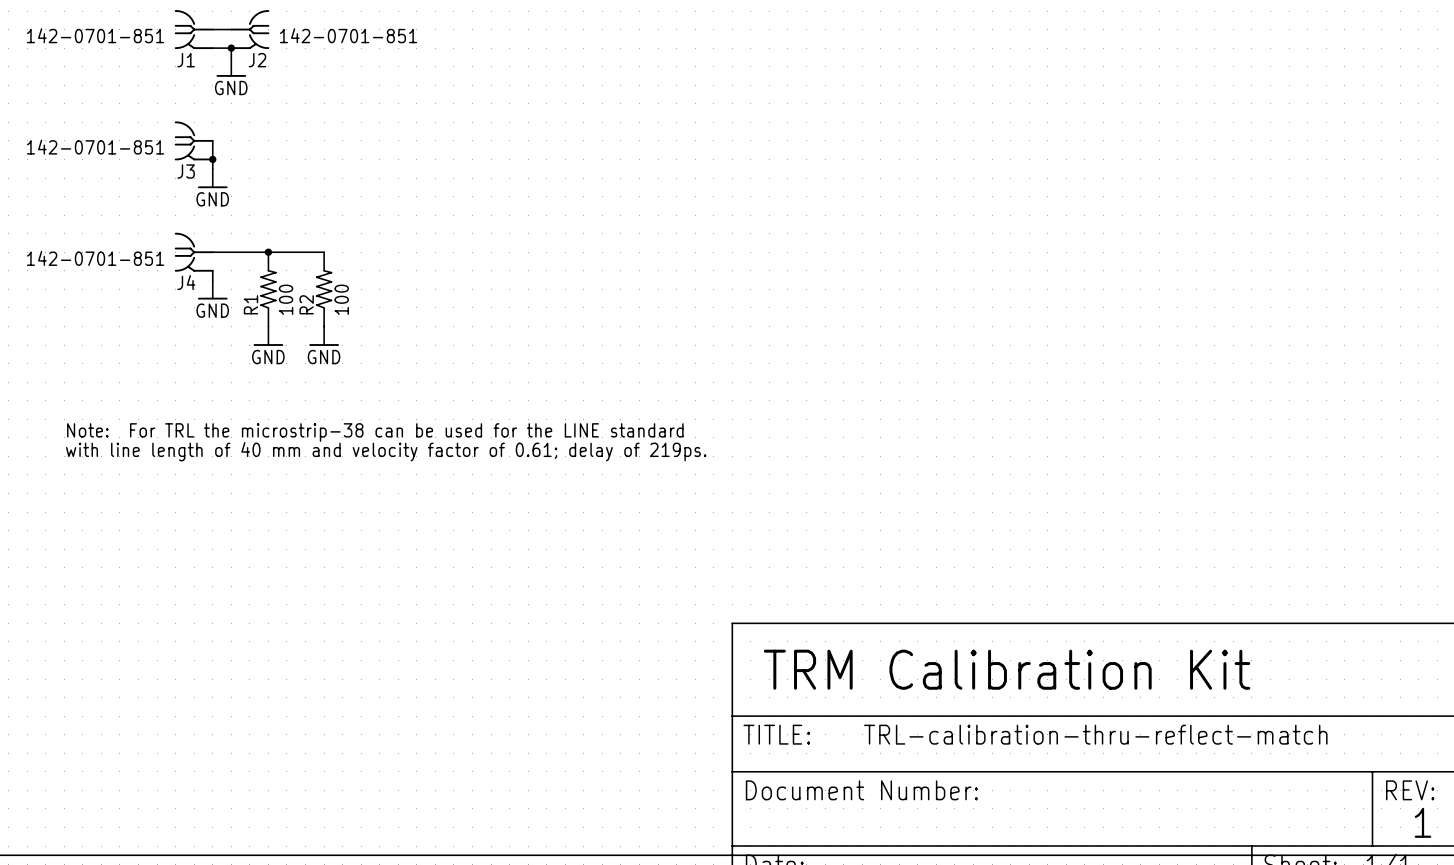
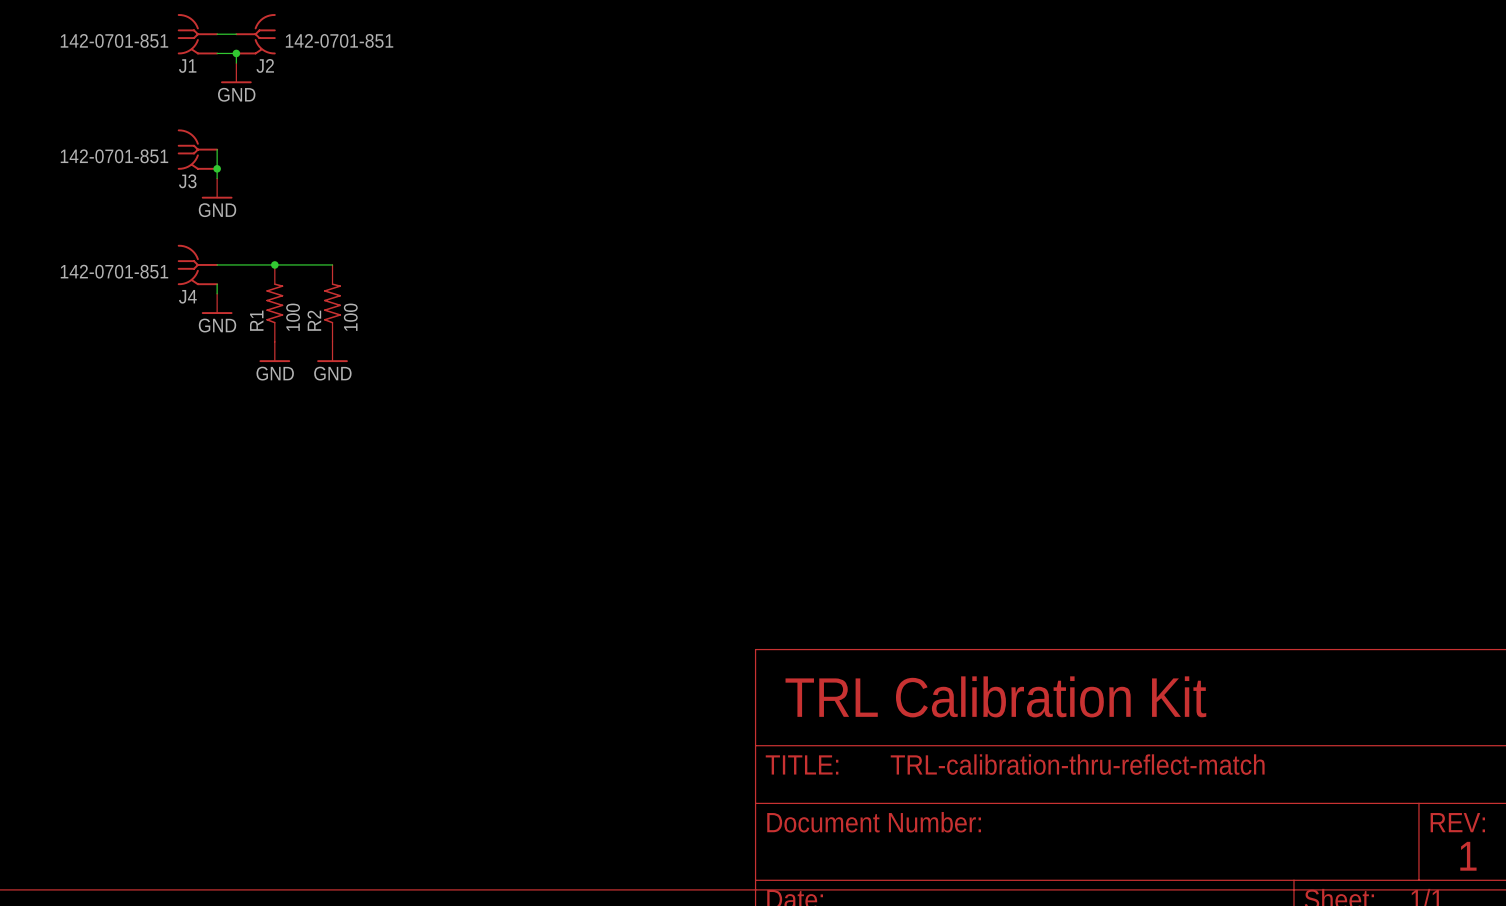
text: Note: For TRL the microstrip-38 can be used for the LINE standard (375, 432) -> none
text: with line length of 40 mm and velocity factor of 0.61; delay of 219ps. (386, 451) -> none
text: TRM Calibration Kit (1007, 669) -> TRL Calibration Kit (995, 696)

